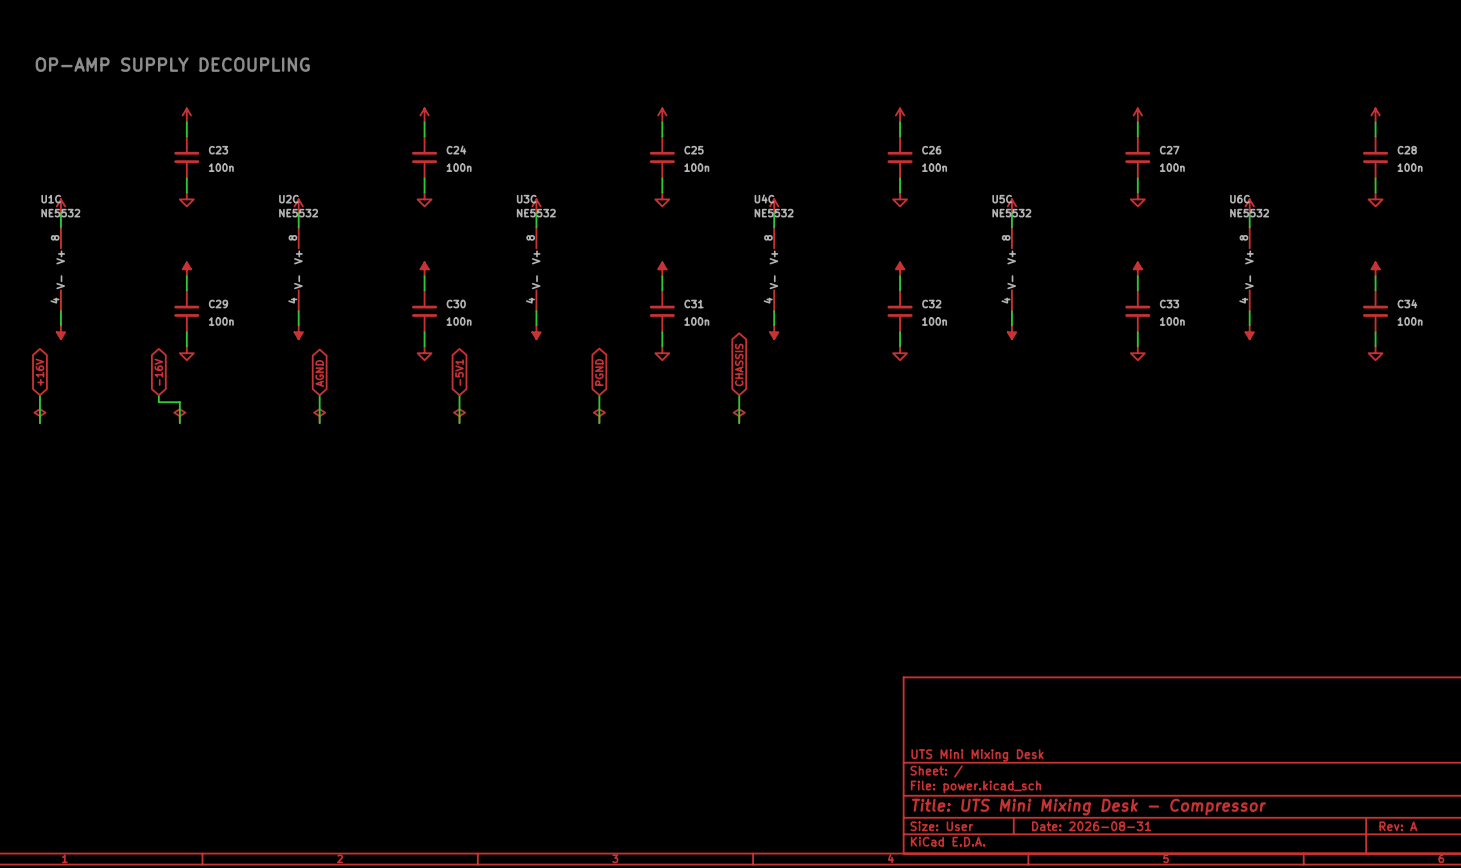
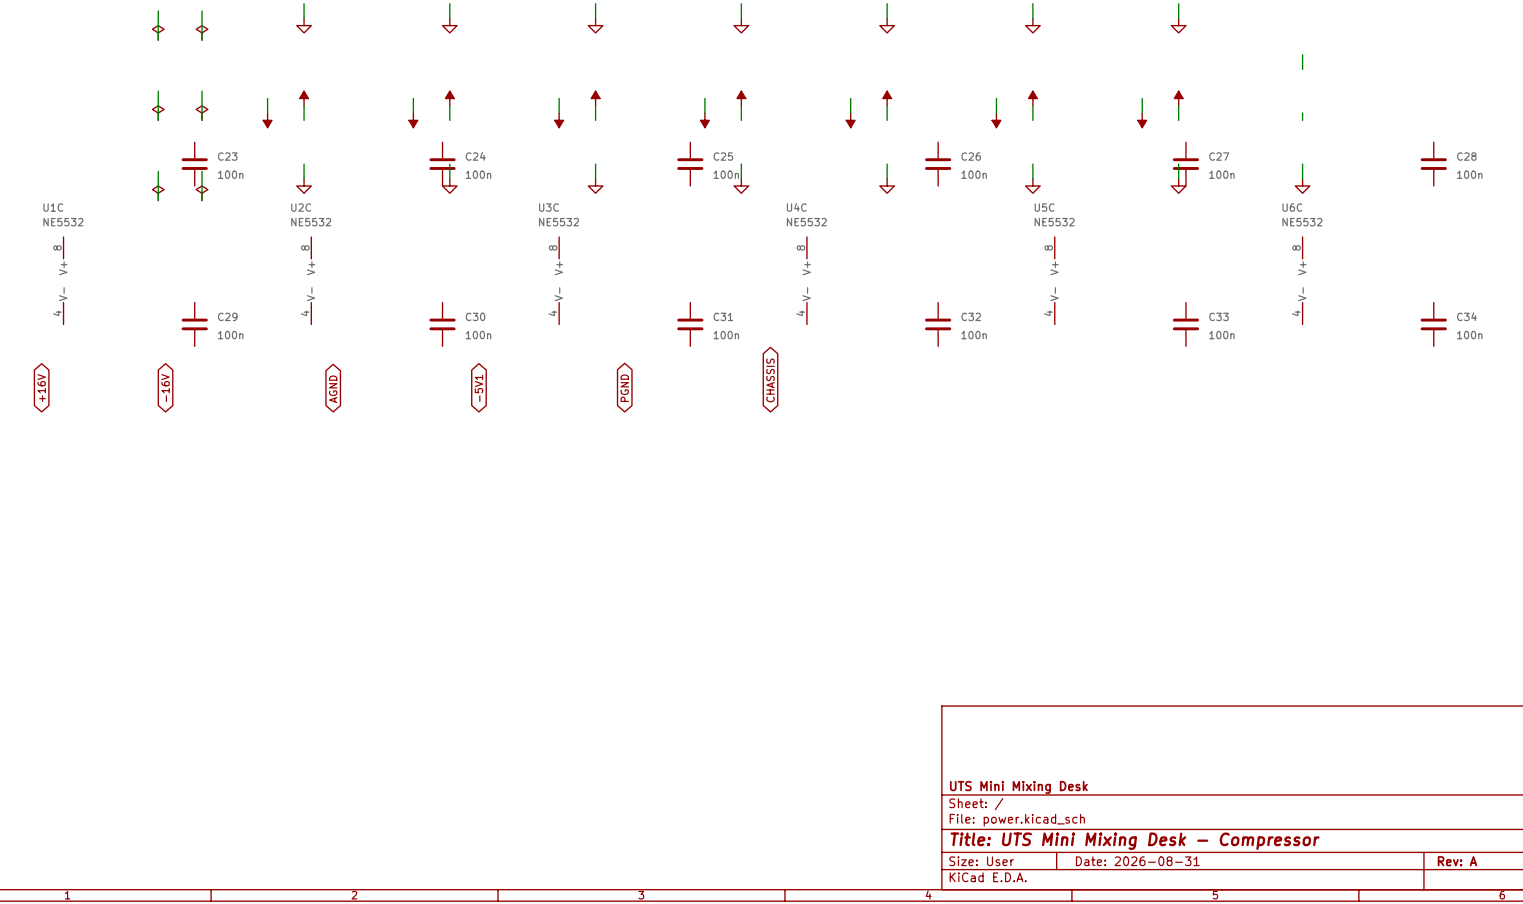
wire: none -> (304, 3) (304, 18)
wire: none -> (595, 3) (595, 18)
wire: none -> (741, 3) (741, 18)
wire: none -> (1032, 3) (1032, 18)
wire: none -> (1178, 3) (1178, 18)
wire: none -> (158, 11) (158, 40)
wire: none -> (202, 11) (202, 40)
power symbol: none -> (304, 25)
power symbol: none -> (449, 25)
power symbol: none -> (595, 25)
power symbol: none -> (741, 25)
power symbol: none -> (887, 25)
power symbol: none -> (1032, 25)
power symbol: none -> (1178, 25)
power symbol: none -> (158, 32)
power symbol: none -> (202, 32)
wire: none -> (1302, 54) (1302, 69)
text: OP-AMP SUPPLY DECOUPLING (172, 64) -> none
wire: none -> (158, 91) (158, 120)
wire: none -> (202, 91) (202, 120)
power symbol: none -> (304, 98)
wire: none -> (413, 98) (413, 113)
power symbol: none -> (449, 98)
wire: none -> (559, 98) (559, 113)
power symbol: none -> (595, 98)
wire: none -> (704, 98) (704, 113)
power symbol: none -> (741, 98)
power symbol: none -> (887, 98)
wire: none -> (996, 98) (996, 113)
power symbol: none -> (1032, 98)
wire: none -> (1142, 98) (1142, 113)
power symbol: none -> (1178, 98)
wire: none -> (595, 105) (595, 120)
wire: none -> (887, 105) (887, 120)
power symbol: none -> (158, 113)
power symbol: none -> (202, 113)
wire: none -> (1302, 113) (1302, 120)
power symbol: (186, 115) -> none
power symbol: none -> (267, 120)
power symbol: none -> (413, 120)
power symbol: (424, 115) -> none
power symbol: none -> (559, 120)
power symbol: (662, 115) -> none
power symbol: none -> (704, 120)
power symbol: none -> (850, 120)
power symbol: (900, 115) -> none
power symbol: none -> (996, 120)
power symbol: none -> (1142, 120)
power symbol: (1137, 115) -> none
power symbol: (1375, 115) -> none
wire: (186, 122) (186, 136) -> (304, 105) (304, 120)
wire: (424, 122) (424, 136) -> (449, 3) (449, 18)
wire: (662, 122) (662, 136) -> (741, 105) (741, 120)
wire: (900, 122) (900, 136) -> (887, 3) (887, 18)
wire: (1137, 122) (1137, 136) -> (1178, 105) (1178, 120)
wire: (1375, 122) (1375, 136) -> (1302, 164) (1302, 178)
wire: none -> (158, 171) (158, 200)
wire: none -> (202, 171) (202, 200)
wire: (186, 178) (186, 192) -> (304, 164) (304, 178)
power symbol: none -> (304, 185)
wire: (424, 178) (424, 192) -> (449, 105) (449, 120)
power symbol: none -> (595, 185)
wire: (662, 178) (662, 192) -> (741, 164) (741, 178)
power symbol: none -> (741, 185)
power symbol: none -> (887, 185)
wire: (900, 178) (900, 192) -> (1032, 164) (1032, 178)
power symbol: none -> (1032, 185)
wire: (1137, 178) (1137, 192) -> (1178, 164) (1178, 178)
power symbol: none -> (1302, 185)
wire: (1375, 178) (1375, 192) -> none
power symbol: none -> (158, 193)
power symbol: none -> (202, 193)
power symbol: (186, 199) -> none
power symbol position: (424, 199) -> (449, 185)
power symbol: (662, 199) -> none
power symbol: (900, 199) -> none
power symbol position: (1137, 199) -> (1178, 185)
power symbol: (1375, 199) -> none
power symbol: (60, 206) -> none
power symbol: (298, 206) -> none
power symbol: (536, 206) -> none
power symbol: (774, 206) -> none
power symbol: (1011, 206) -> none
power symbol: (1249, 206) -> none
wire: (60, 213) (60, 227) -> none
wire: (298, 213) (298, 227) -> (267, 98) (267, 113)
wire: (536, 213) (536, 227) -> (595, 164) (595, 178)
wire: (774, 213) (774, 227) -> (850, 98) (850, 113)
wire: (1011, 213) (1011, 227) -> (1032, 105) (1032, 120)
wire: (1249, 213) (1249, 227) -> none
power symbol: (186, 269) -> none
power symbol: (424, 269) -> none
power symbol: (662, 269) -> none
power symbol: (900, 269) -> none
power symbol: (1137, 269) -> none
power symbol: (1375, 269) -> none
wire: (186, 276) (186, 290) -> none
wire: (424, 276) (424, 290) -> (449, 164) (449, 178)
wire: (662, 276) (662, 290) -> none
wire: (900, 276) (900, 290) -> (887, 164) (887, 178)
wire: (1137, 276) (1137, 290) -> none
wire: (1375, 276) (1375, 290) -> none
wire: (60, 311) (60, 325) -> none
wire: (298, 311) (298, 325) -> none
wire: (536, 311) (536, 325) -> none
wire: (774, 311) (774, 325) -> none
wire: (1011, 311) (1011, 325) -> none
wire: (1249, 311) (1249, 325) -> none
power symbol: (60, 332) -> none
wire: (186, 332) (186, 346) -> none
power symbol: (298, 332) -> none
wire: (424, 332) (424, 346) -> none
power symbol: (536, 332) -> none
wire: (662, 332) (662, 346) -> none
power symbol: (774, 332) -> none
wire: (900, 332) (900, 346) -> none
power symbol: (1011, 332) -> none
wire: (1137, 332) (1137, 346) -> none
power symbol: (1249, 332) -> none
wire: (1375, 332) (1375, 346) -> none
power symbol: (186, 353) -> none
power symbol: (424, 353) -> none
power symbol: (662, 353) -> none
power symbol: (900, 353) -> none
power symbol: (1137, 353) -> none
power symbol: (1375, 353) -> none
wire: (39, 395) (39, 423) -> none
wire: (158, 395) (158, 402) (179, 402) (179, 423) -> none
wire: (319, 395) (319, 423) -> none
wire: (459, 395) (459, 423) -> none
wire: (599, 395) (599, 423) -> none
wire: (739, 395) (739, 423) -> none
power symbol: (39, 416) -> none
power symbol: (179, 416) -> none
power symbol: (319, 416) -> none
power symbol: (459, 416) -> none
power symbol: (599, 416) -> none
power symbol: (739, 416) -> none

